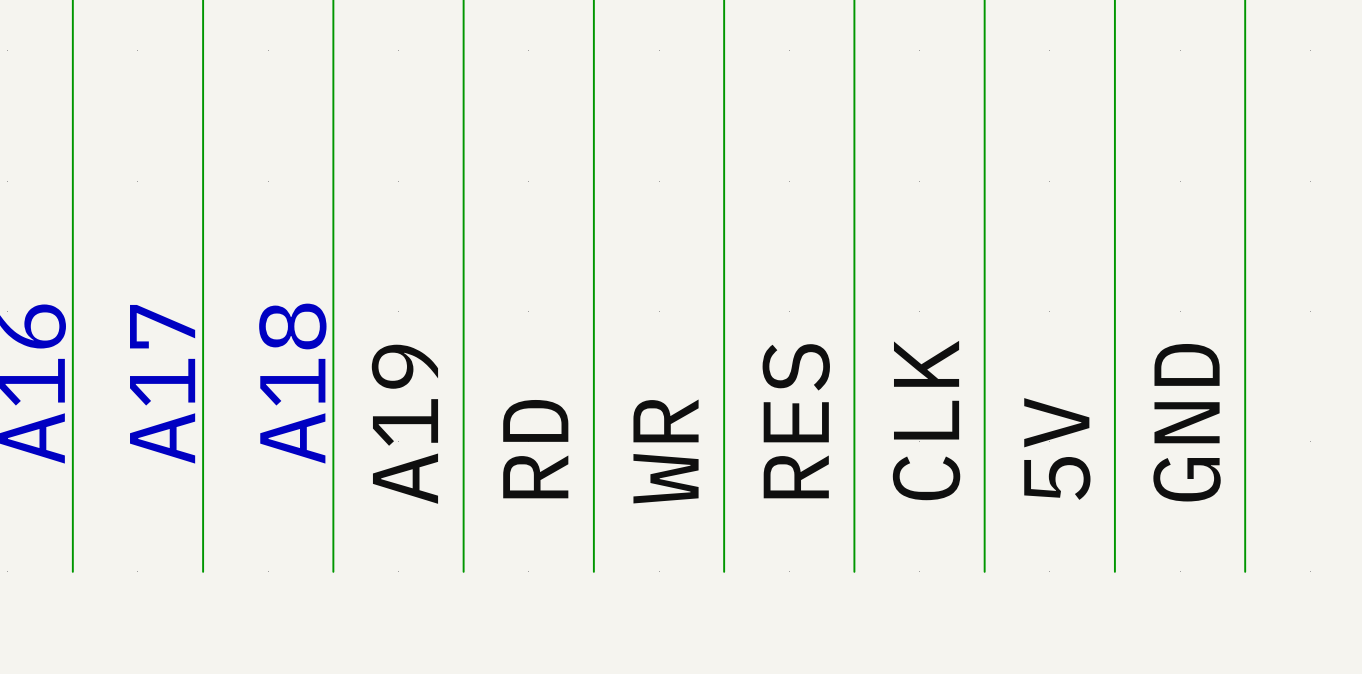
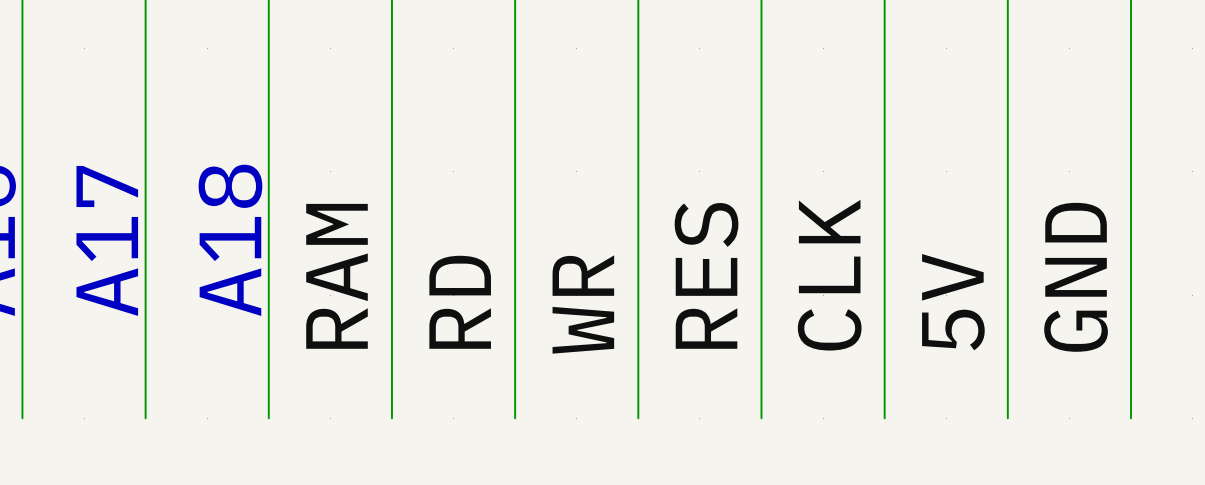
label: A19 (404, 424) -> RAM (337, 276)

